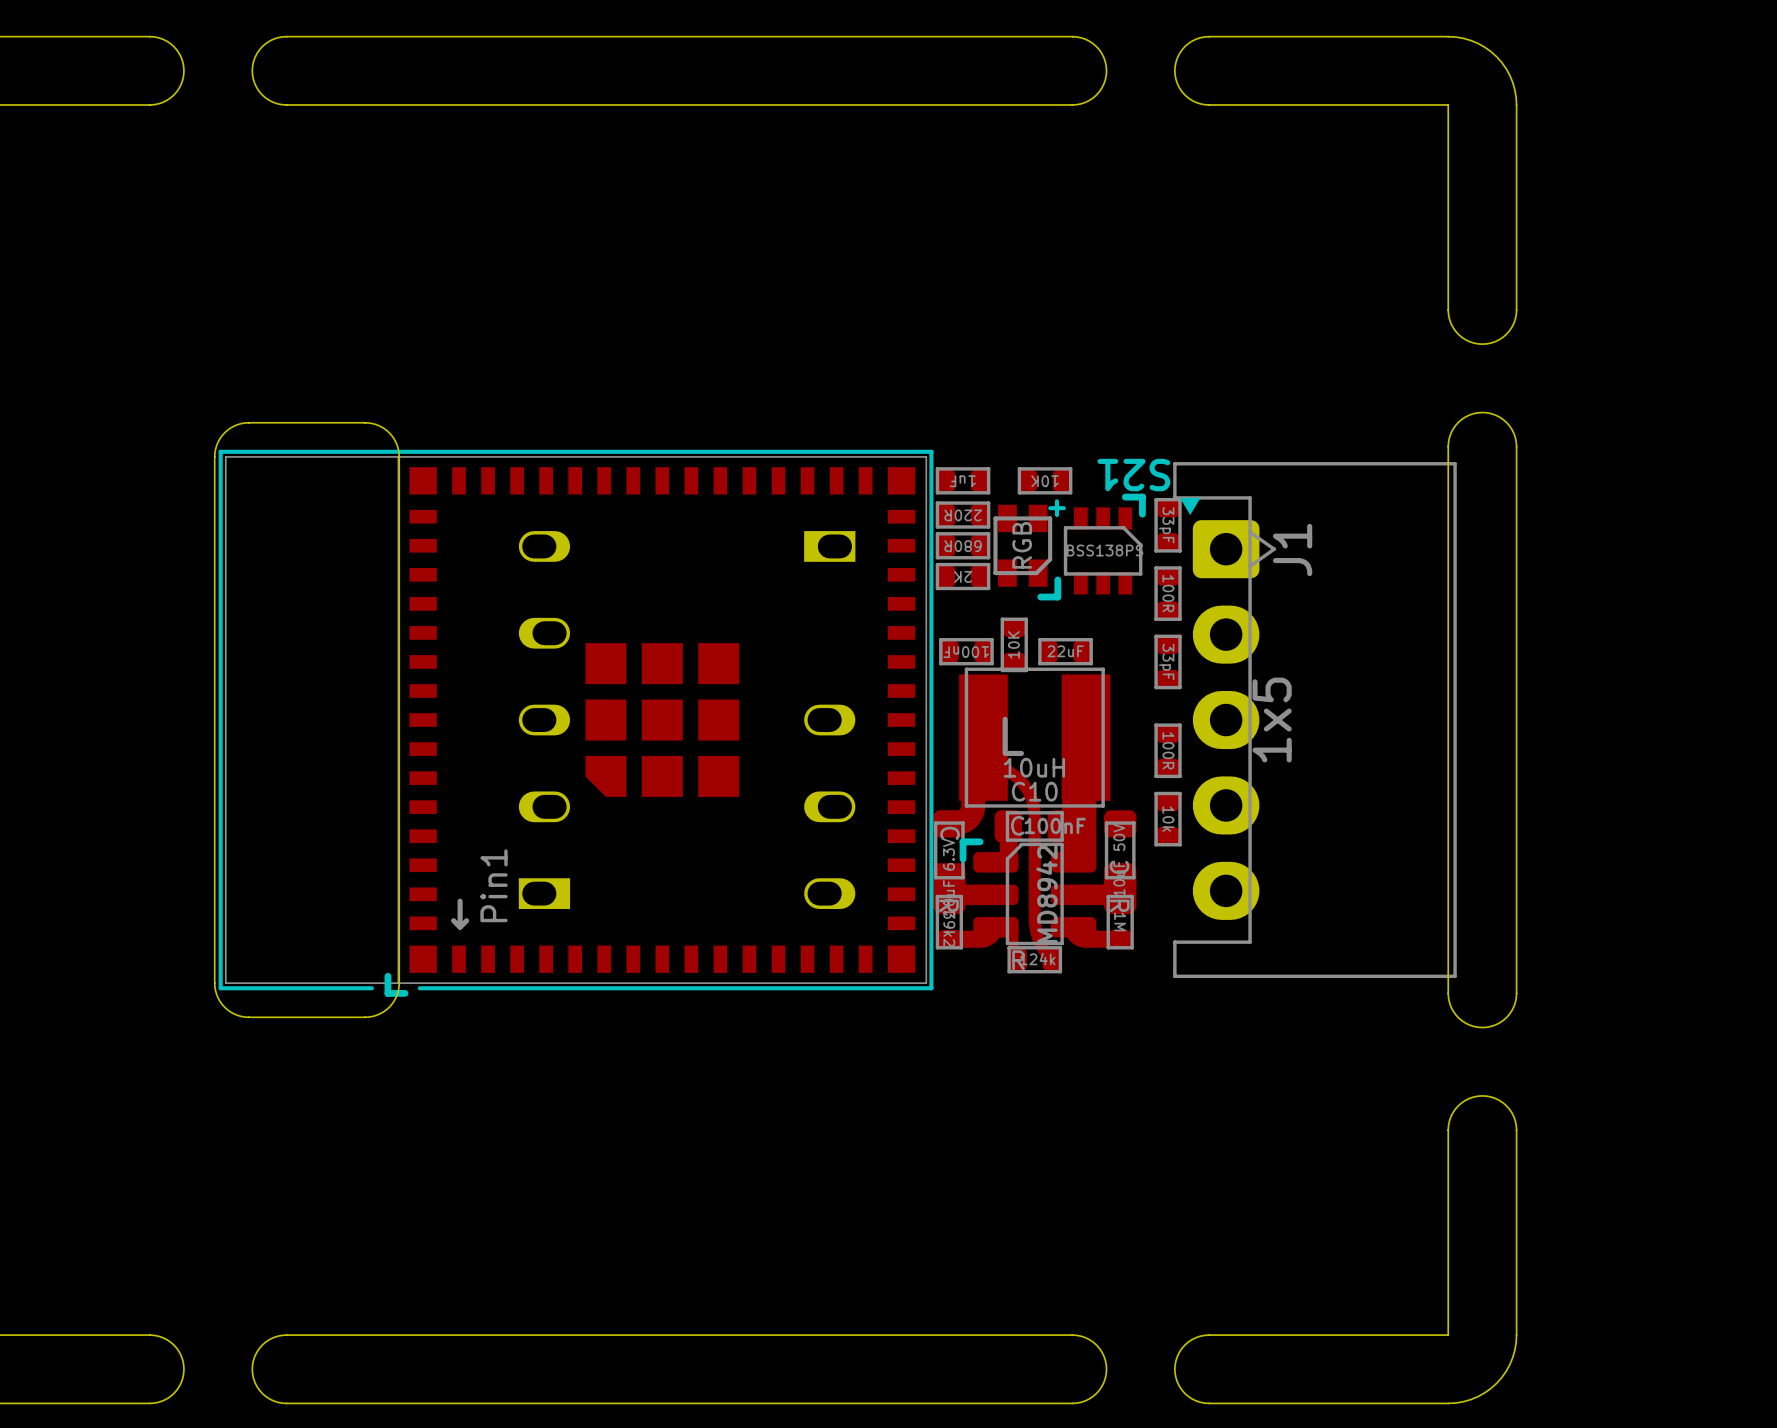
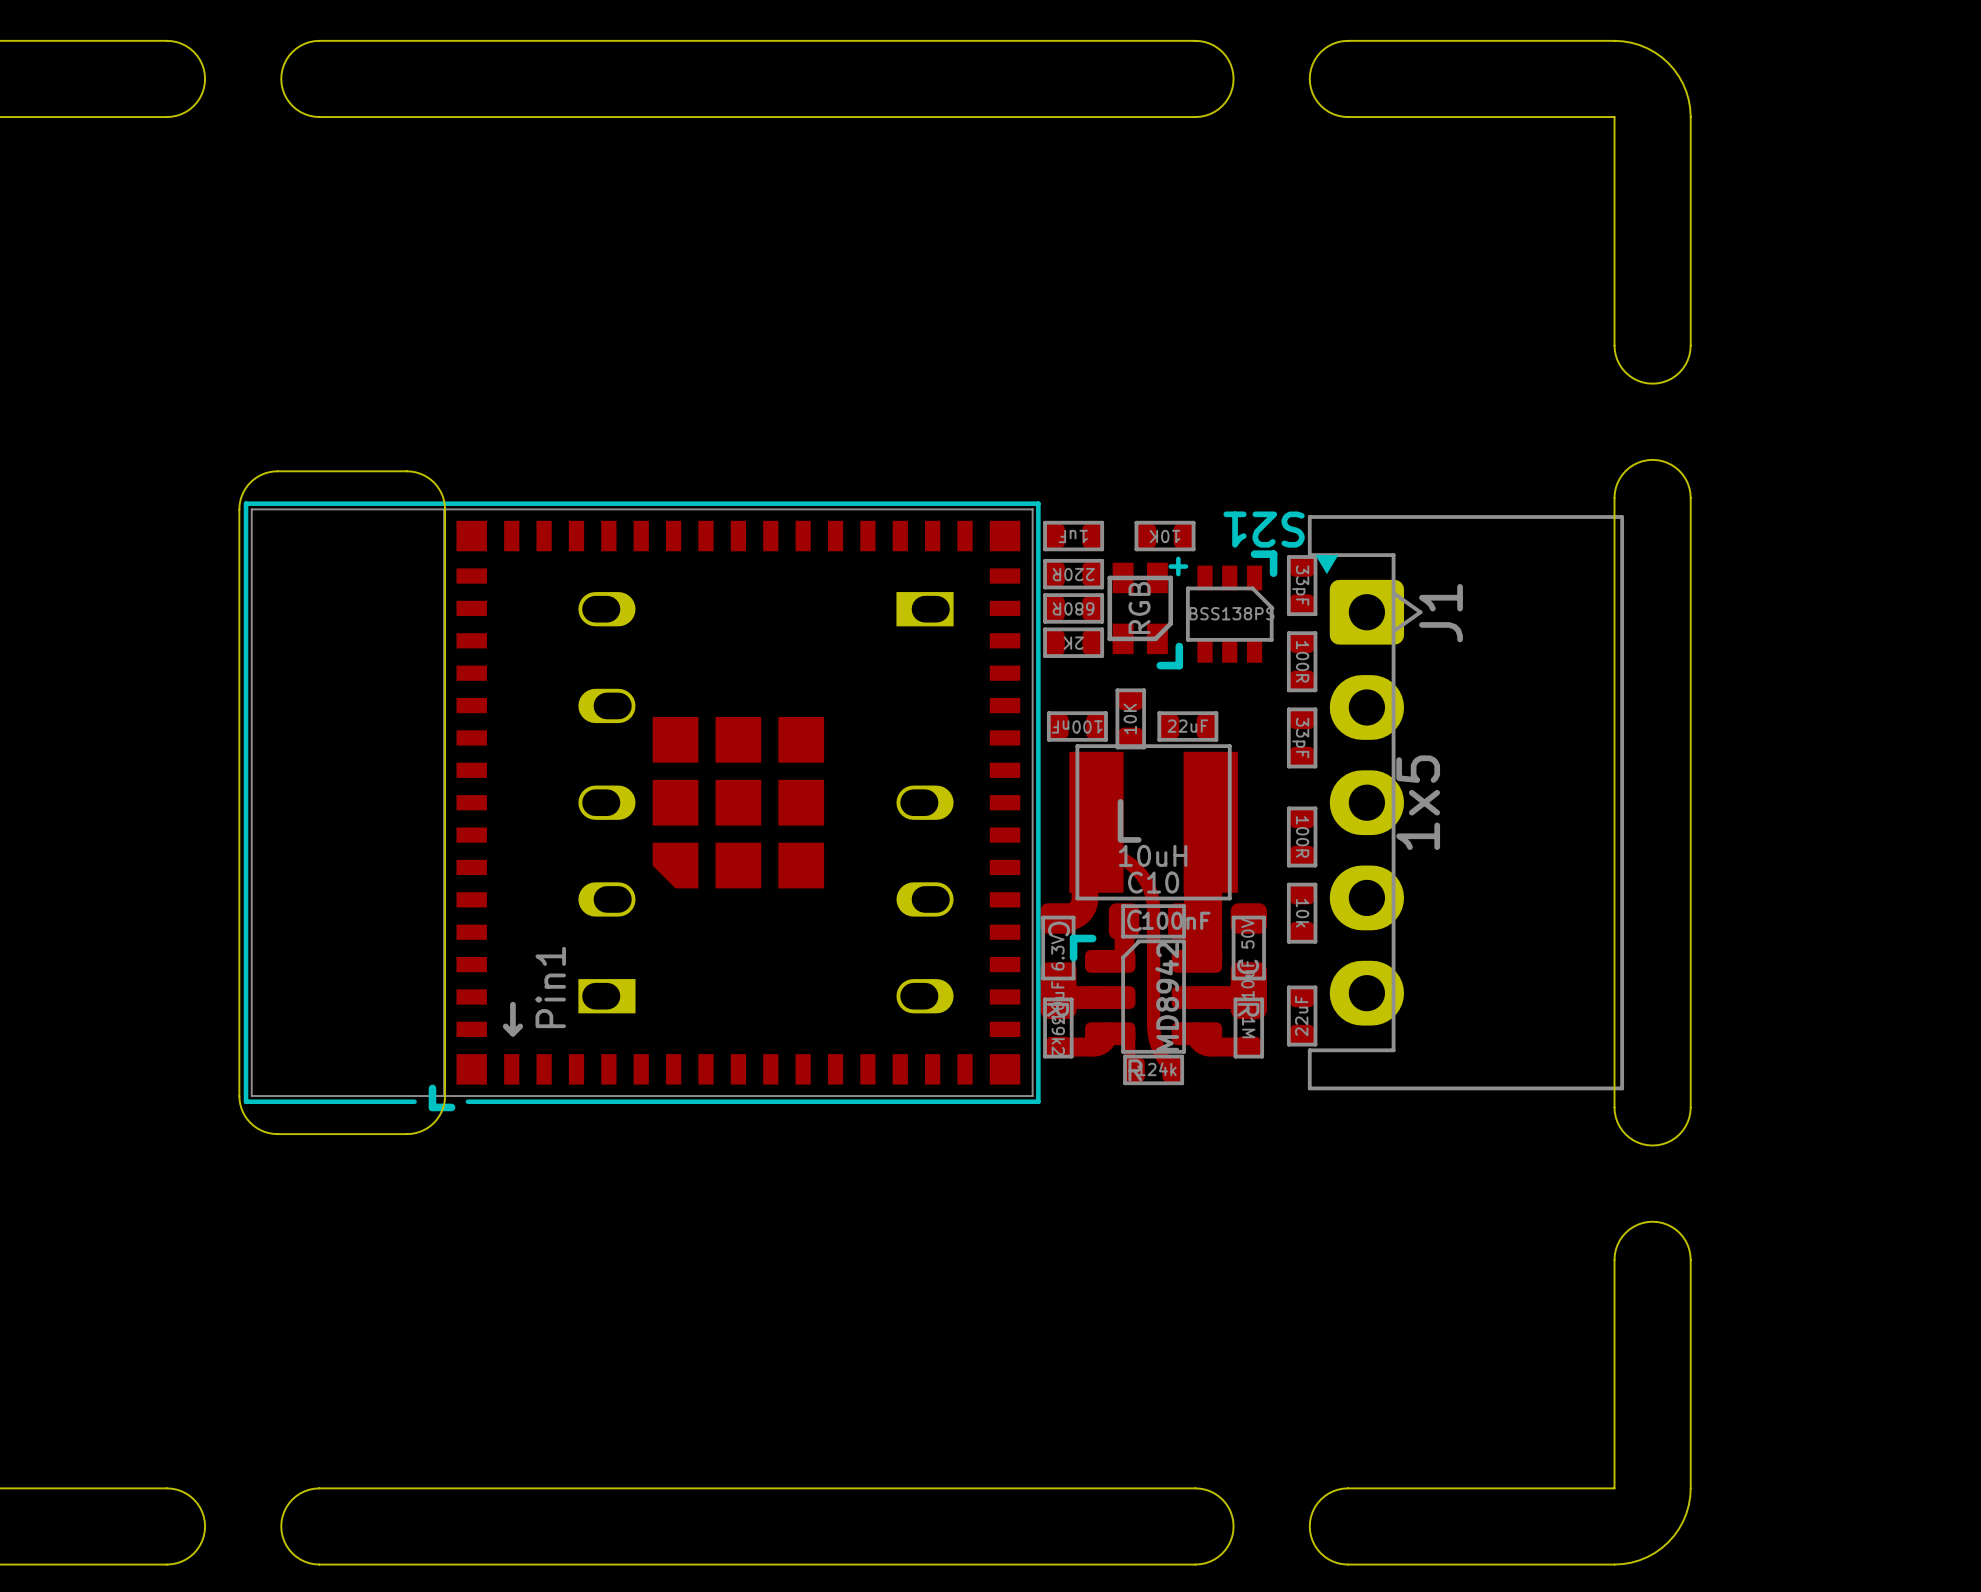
part: none -> 22uF (1302, 1016)

